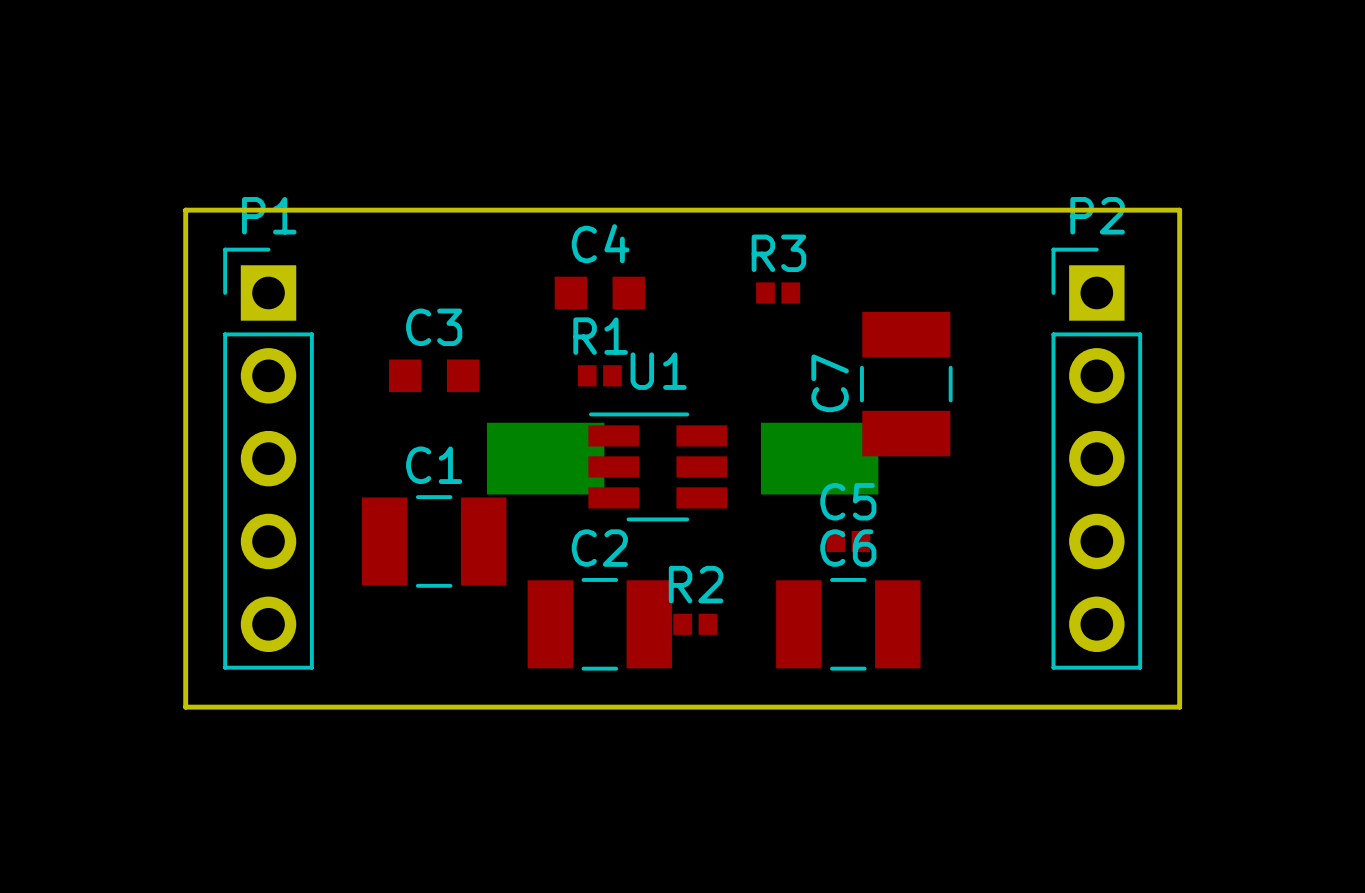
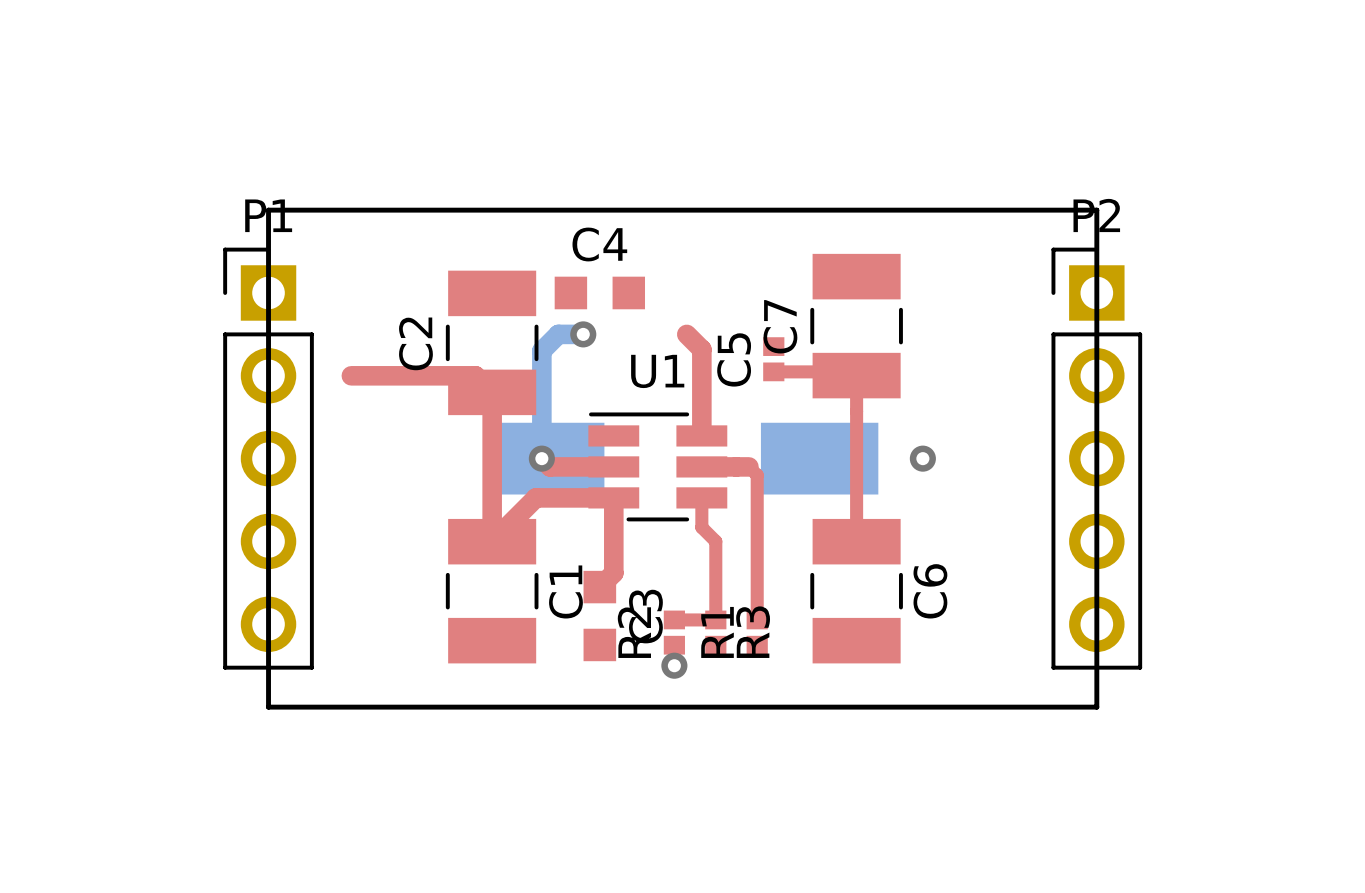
board edge: (268, 210) (185, 210) (185, 707) (268, 707) -> (268, 210) (268, 707)
board edge: (1096, 210) (1179, 210) (1179, 707) (1096, 707) -> (1096, 210) (1096, 707)
R3 rotation: 0° (778, 292) -> 90° clockwise (715, 632)
R3 position: (778, 292) -> (715, 632)
bottom track: none -> (583, 334) (558, 334) (541, 350) (541, 458)
via: none -> (583, 334)
top track: none -> (686, 334) (701, 349) (701, 435)
top track: none -> (773, 371) (852, 371) (856, 375) (856, 541)
top track: none -> (351, 375) (475, 375) (492, 392) (492, 541) (535, 497) (613, 497) (613, 573) (599, 587)
C3 rotation: 0° (434, 375) -> 90° clockwise (599, 616)
C3 position: (434, 375) -> (599, 616)
R1 rotation: 0° (599, 375) -> 90° clockwise (757, 632)
R1 position: (599, 375) -> (757, 632)
C7 position: (906, 384) -> (856, 326)
top track: none -> (541, 458) (550, 466) (613, 466)
via: none -> (541, 458)
via: none -> (922, 458)
top track: none -> (701, 466) (748, 466) (757, 475) (757, 619)
top track: none -> (701, 497) (701, 527) (715, 541) (715, 619) (674, 619)
C1 rotation: 0° (434, 541) -> 90° clockwise (492, 591)
C5 rotation: 0° (848, 541) -> 90° clockwise (773, 359)
C5 position: (848, 541) -> (773, 359)
C2 name position: C2 (599, 548) -> C2 (415, 343)
C2 rotation: 0° (599, 624) -> 90° clockwise (492, 342)
C2 position: (599, 624) -> (492, 342)
R2 rotation: 0° (695, 624) -> 90° clockwise (674, 632)
C6 rotation: 0° (848, 624) -> 90° clockwise (856, 591)
via: none -> (674, 665)

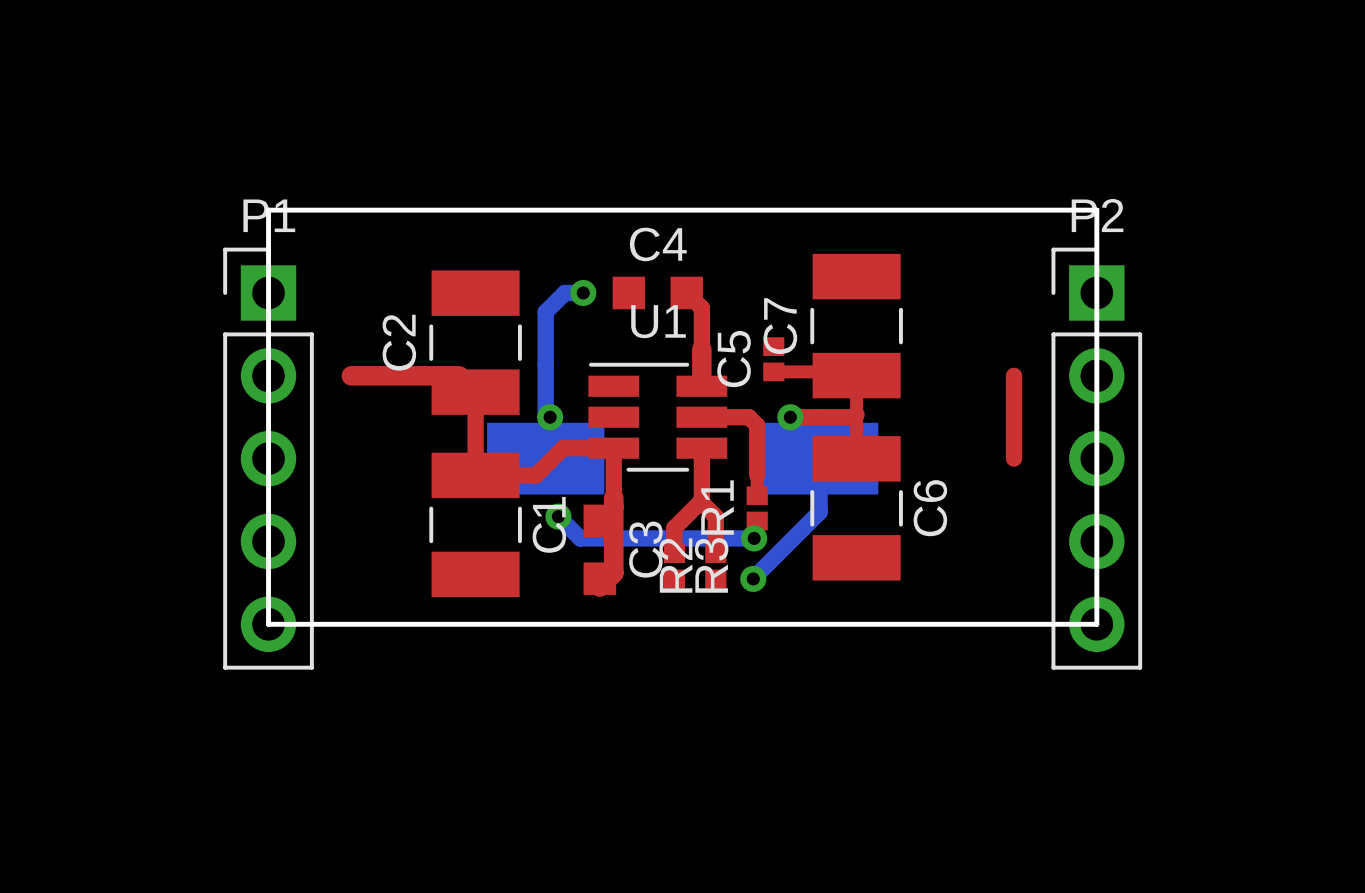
bottom track: none -> (583, 292) (564, 292) (545, 312) (545, 417)
C4 position: (599, 292) -> (657, 292)
bottom track: (583, 334) (558, 334) (541, 350) (541, 458) -> none
via position: (583, 334) -> (583, 292)
top track: (686, 334) (701, 349) -> (686, 292) (701, 308) (701, 349)
C2 position: (492, 342) -> (475, 342)
top track: (459, 375) (475, 375) (492, 392) (492, 541) (535, 497) (613, 497) -> (459, 375) (475, 392) (475, 475) (535, 475) (563, 448) (613, 448) (613, 497)
top track: (701, 386) (701, 435) -> (701, 448) (701, 497)
top track: none -> (856, 414) (854, 417) (790, 417)
via: none -> (550, 417)
via: none -> (790, 417)
bottom track: none -> (819, 417) (819, 512) (752, 578)
top track: (541, 458) (550, 466) (613, 466) -> none
via: (541, 458) -> none
top track: (856, 458) (856, 541) -> (1013, 375) (1013, 458)
via: (922, 458) -> none
U1 position: (657, 466) -> (657, 417)
top track: (701, 466) (748, 466) (757, 475) -> (701, 417) (748, 417) (757, 425) (757, 475)
top track: (757, 495) (757, 619) -> none
top track: none -> (701, 500) (674, 528) (674, 553)
top track: (701, 502) (701, 527) (715, 541) -> (701, 502) (715, 516) (715, 541)
bottom track: none -> (558, 516) (580, 538) (754, 538)
via: none -> (558, 516)
via: none -> (754, 538)
top track: (715, 553) (715, 619) (674, 619) -> none
via: none -> (753, 578)
C1 position: (492, 591) -> (475, 524)
C6 position: (856, 591) -> (856, 508)
C3 position: (599, 616) -> (599, 549)
board edge: (268, 624) (268, 707) (1096, 707) (1096, 624) -> (268, 624) (1096, 624)
R2 position: (674, 632) -> (715, 566)
R3 position: (715, 632) -> (674, 566)
R1 position: (757, 632) -> (757, 508)
via: (674, 665) -> none

